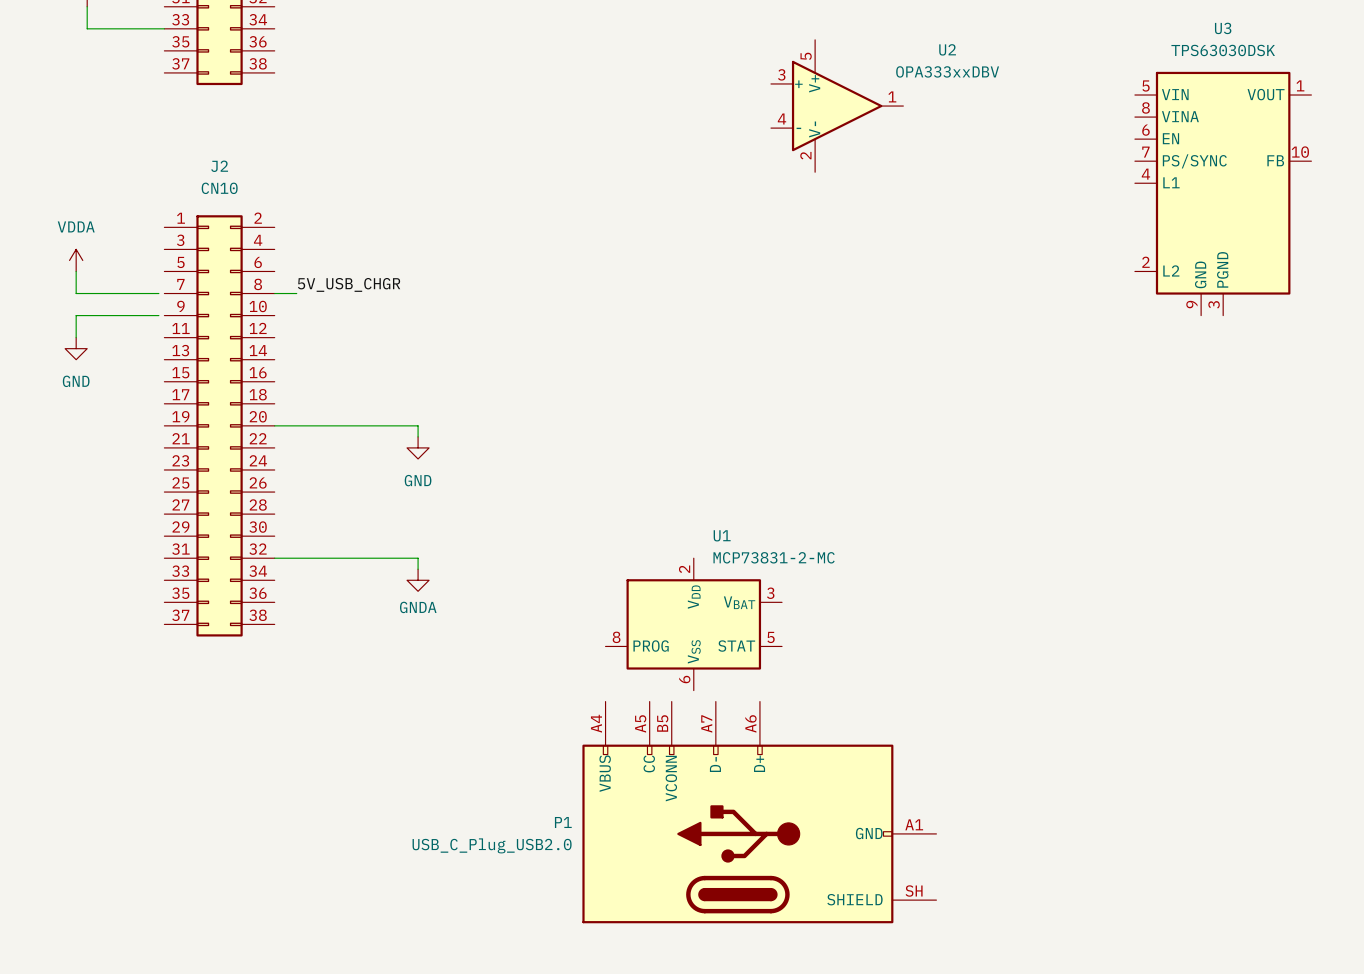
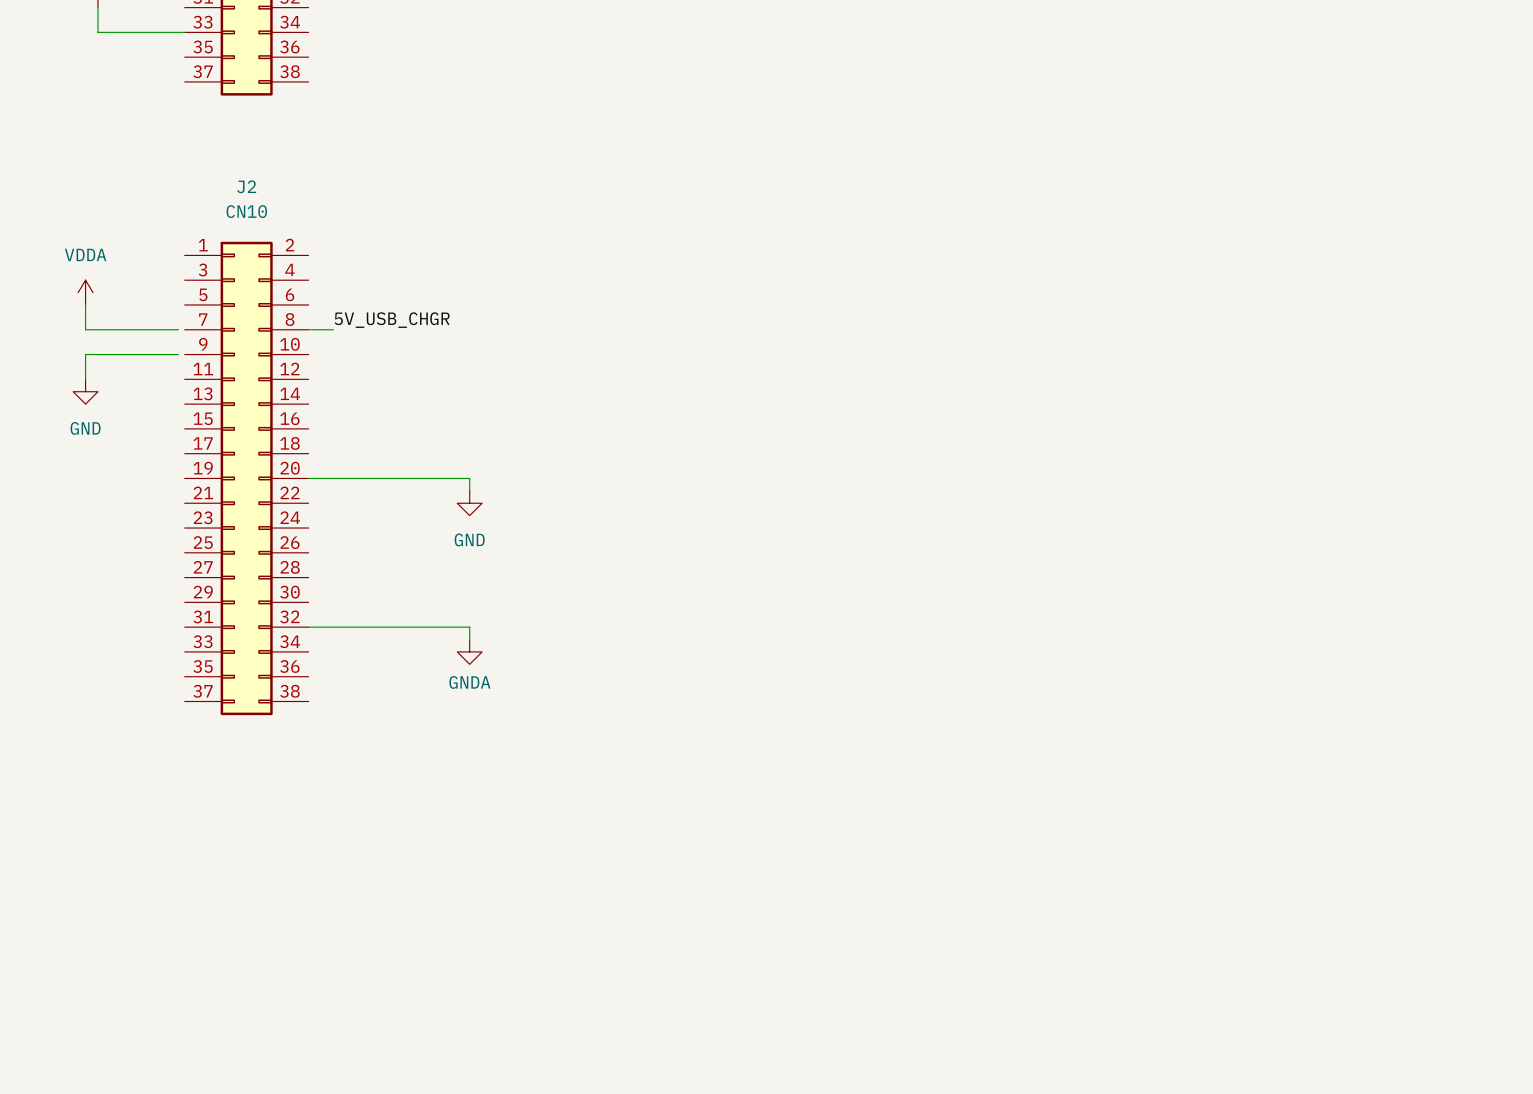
U2: OPA333xxDBV (837, 106) -> none
U3: TPS63030DSK (1223, 193) -> none
U1: MCP73831-2-MC (693, 624) -> none
P1: USB_C_Plug_USB2.0 (759, 812) -> none

